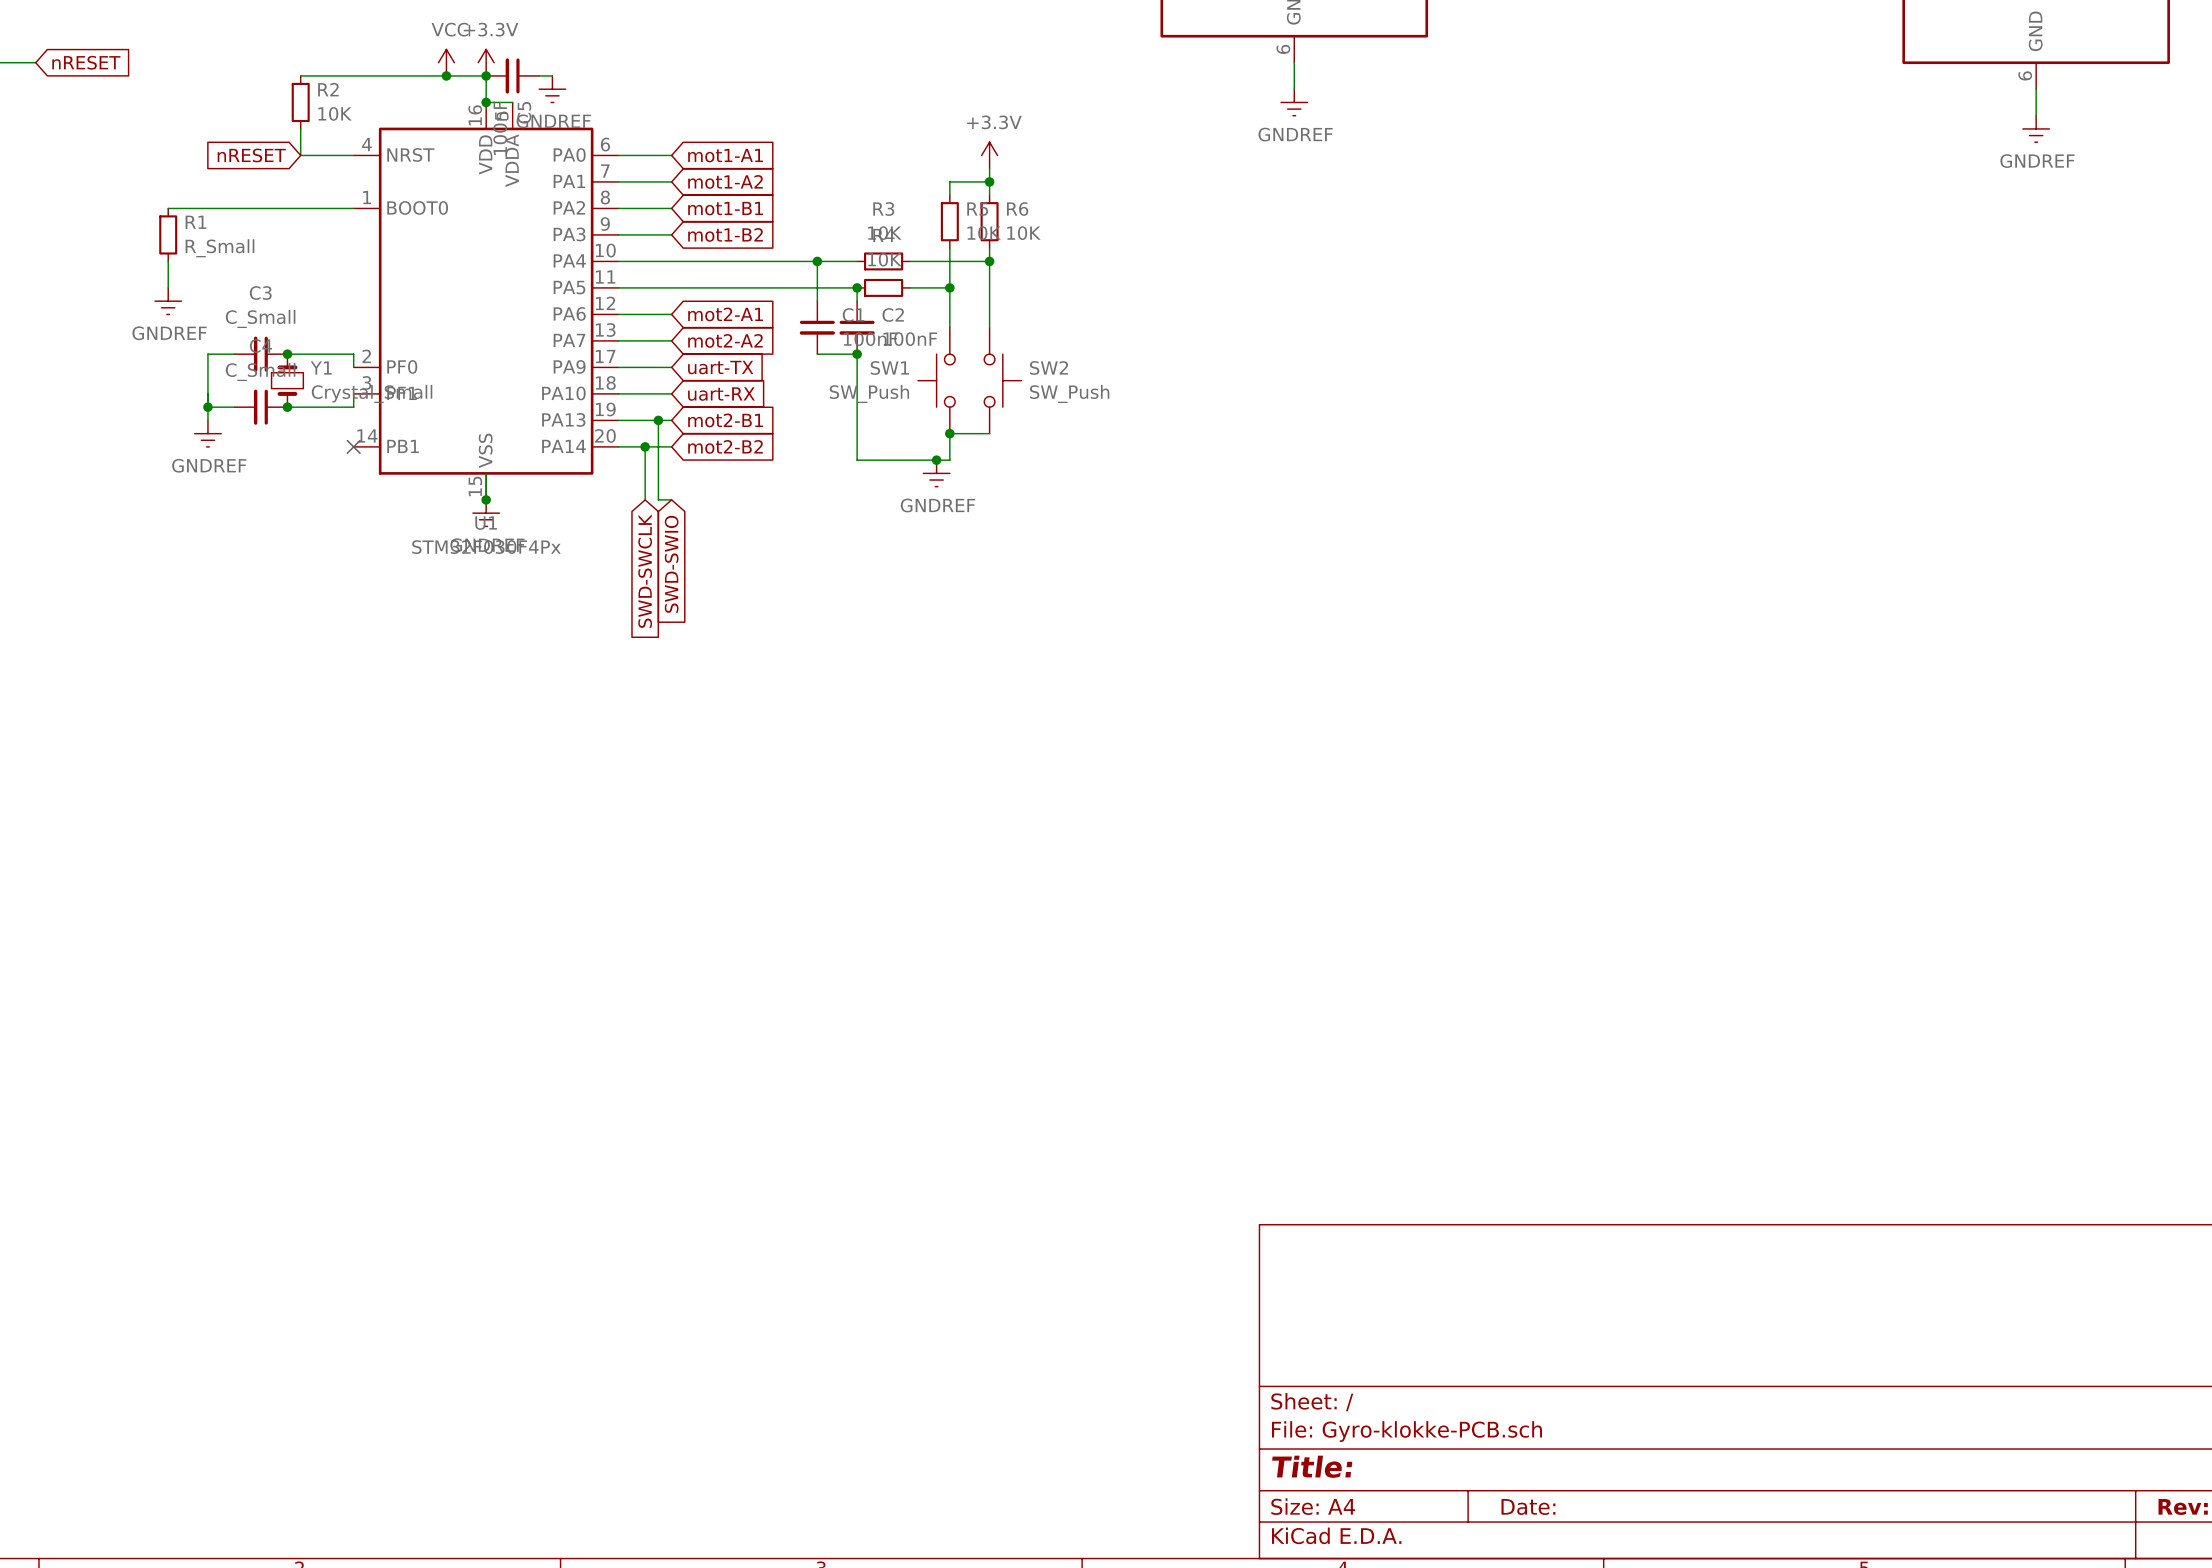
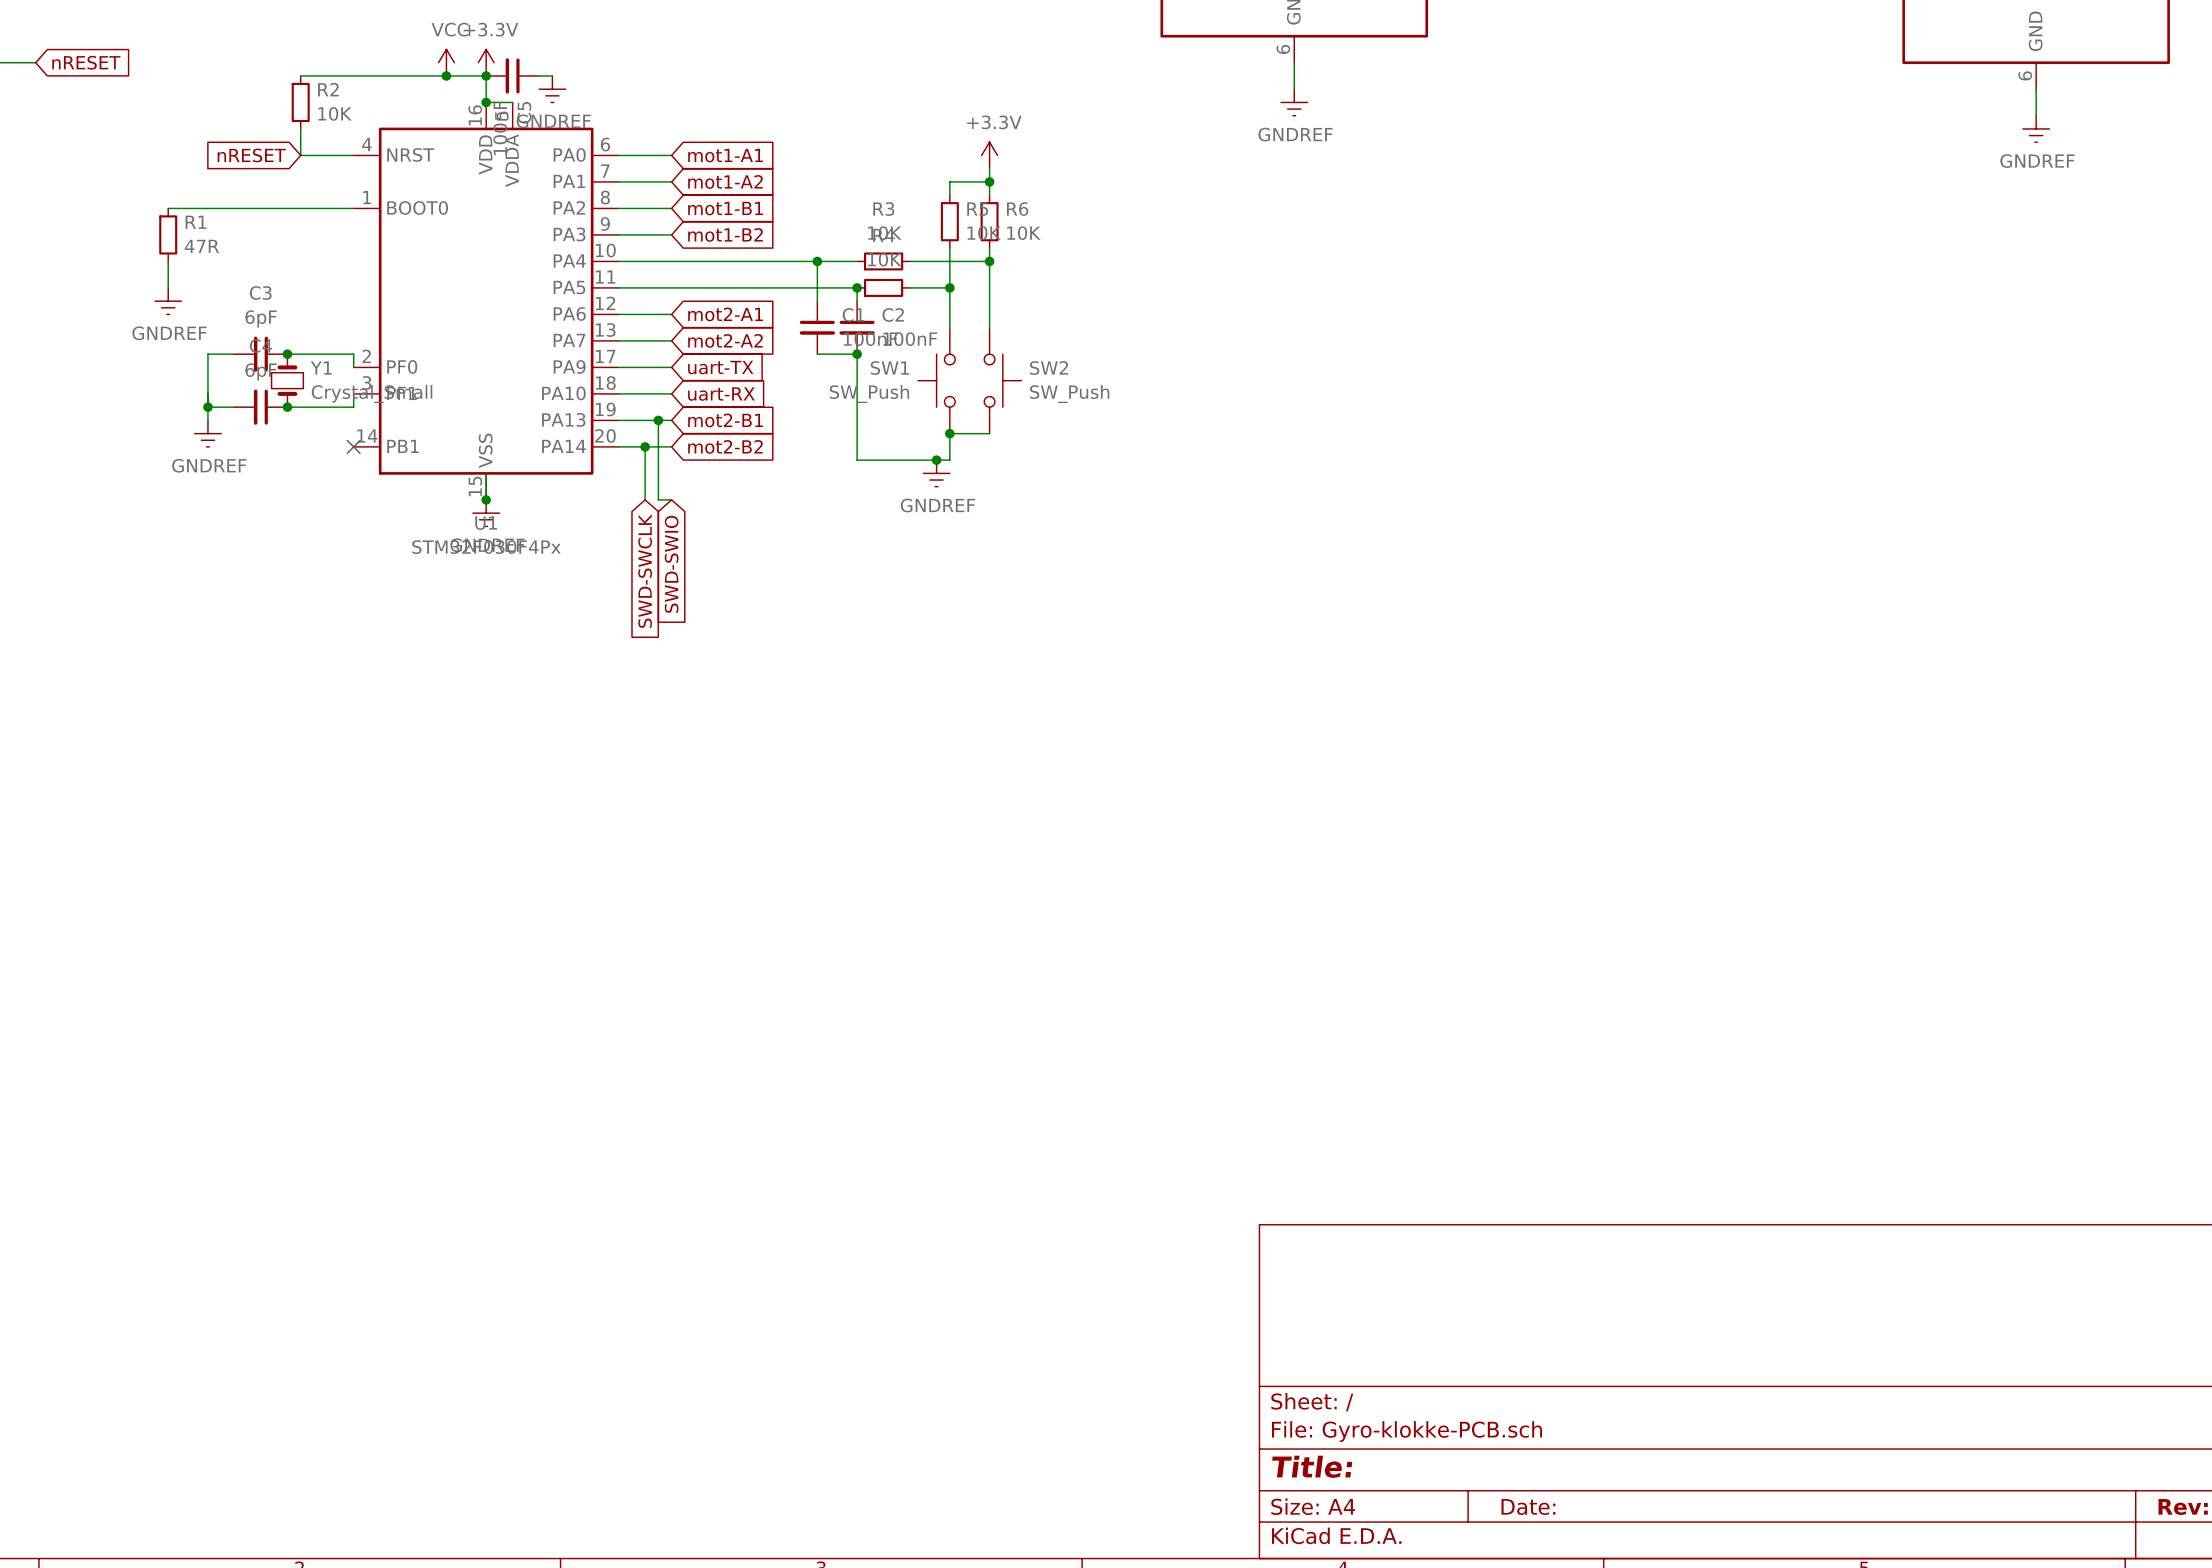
R1 value: R_Small (219, 248) -> 47R (201, 246)
C3 value: C_Small (260, 318) -> 6pF (261, 318)
C4 value: C_Small (260, 371) -> 6pF (261, 371)

